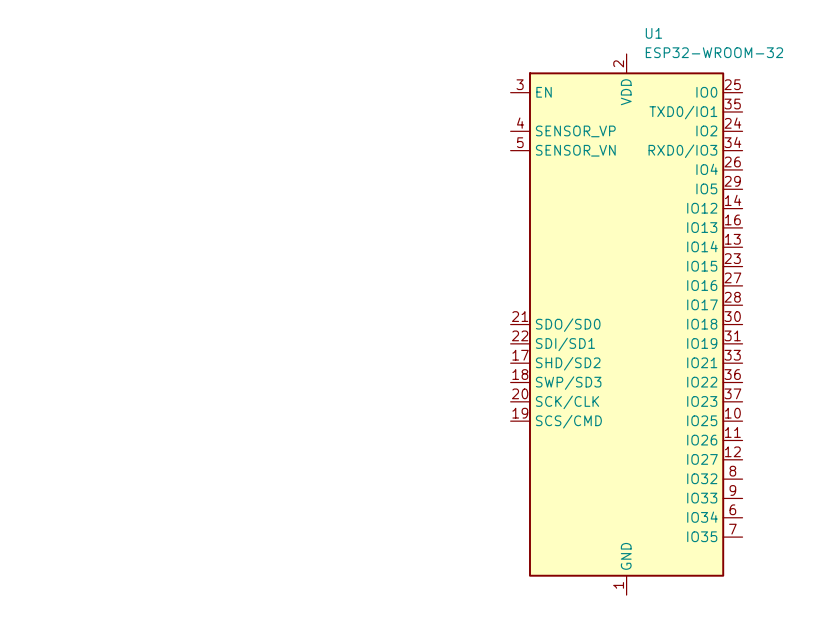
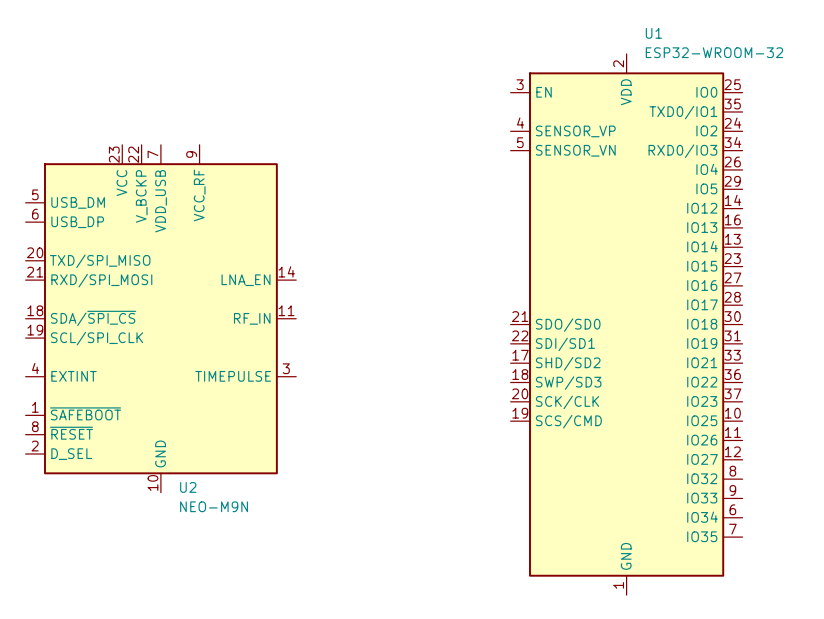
U2: none -> NEO-M9N (160, 318)

